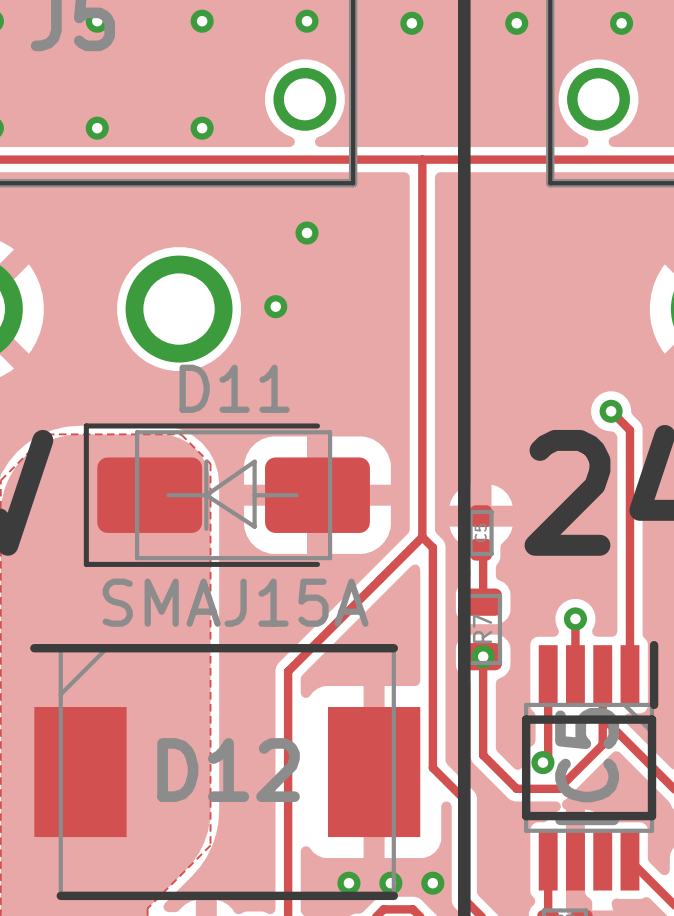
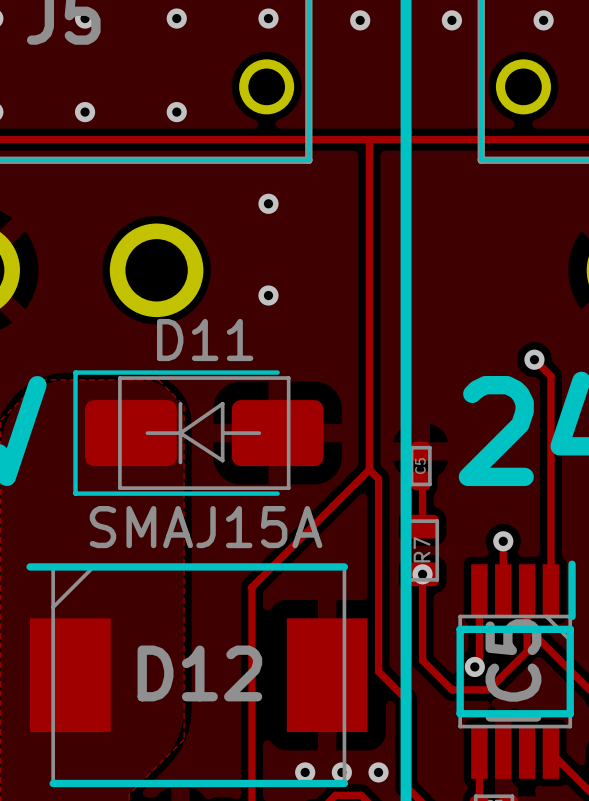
via position: (275, 306) -> (268, 295)

